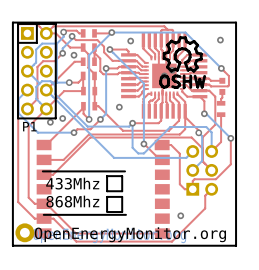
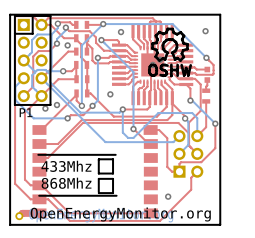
part footprint: [15, 223, 35, 243] -> [15, 212, 24, 221]

